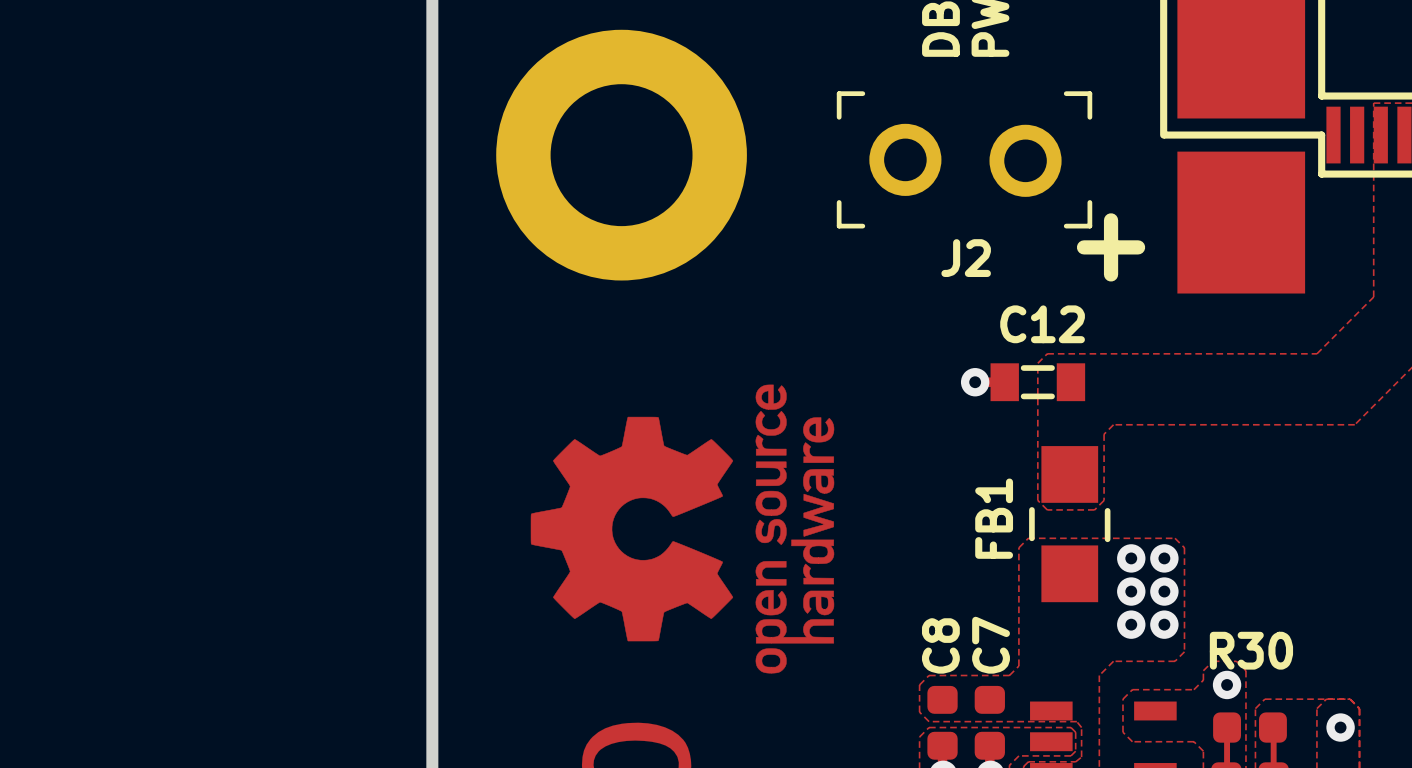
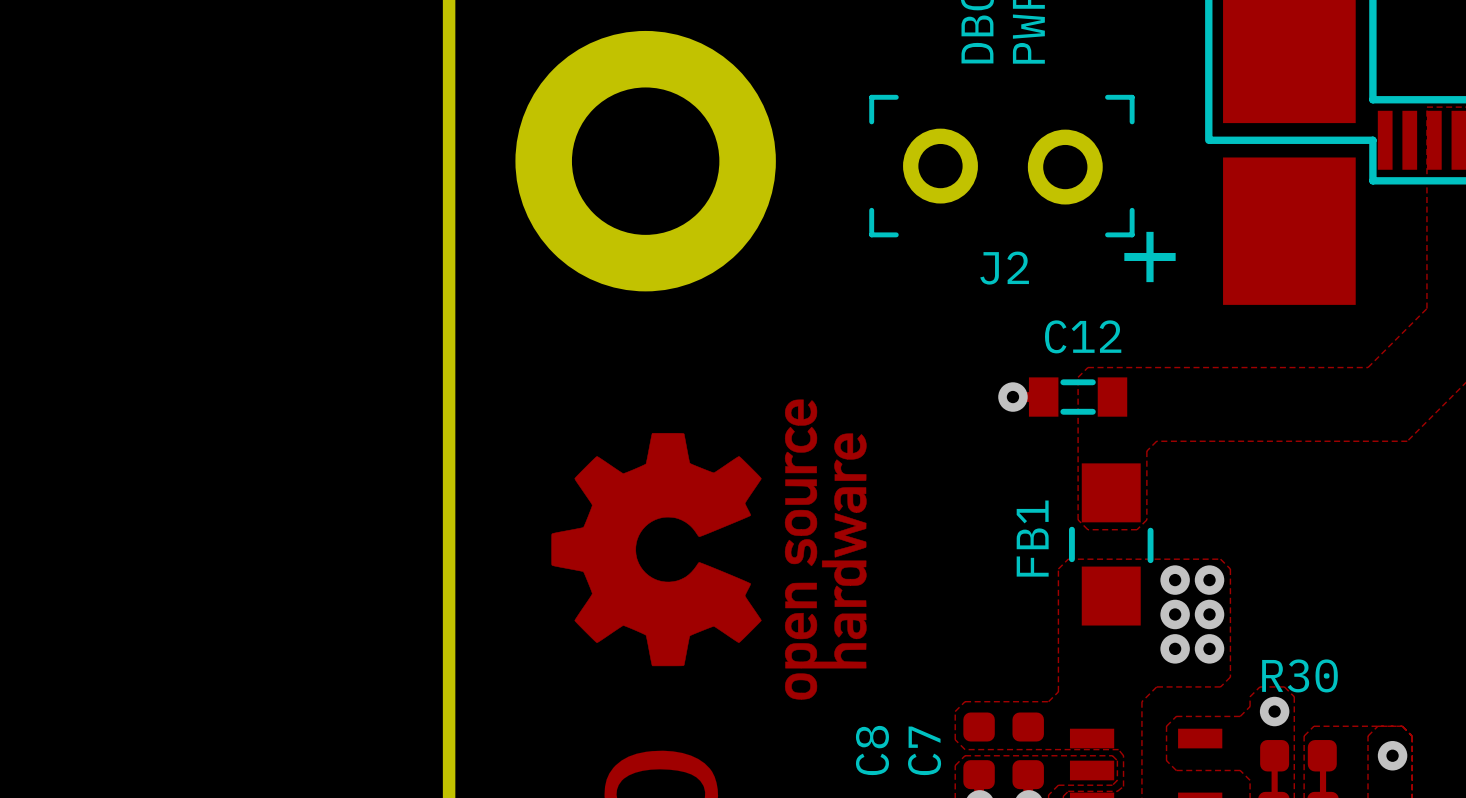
C8 name position: C8 (940, 645) -> C8 (872, 750)
C7 name position: C7 (991, 645) -> C7 (924, 750)

